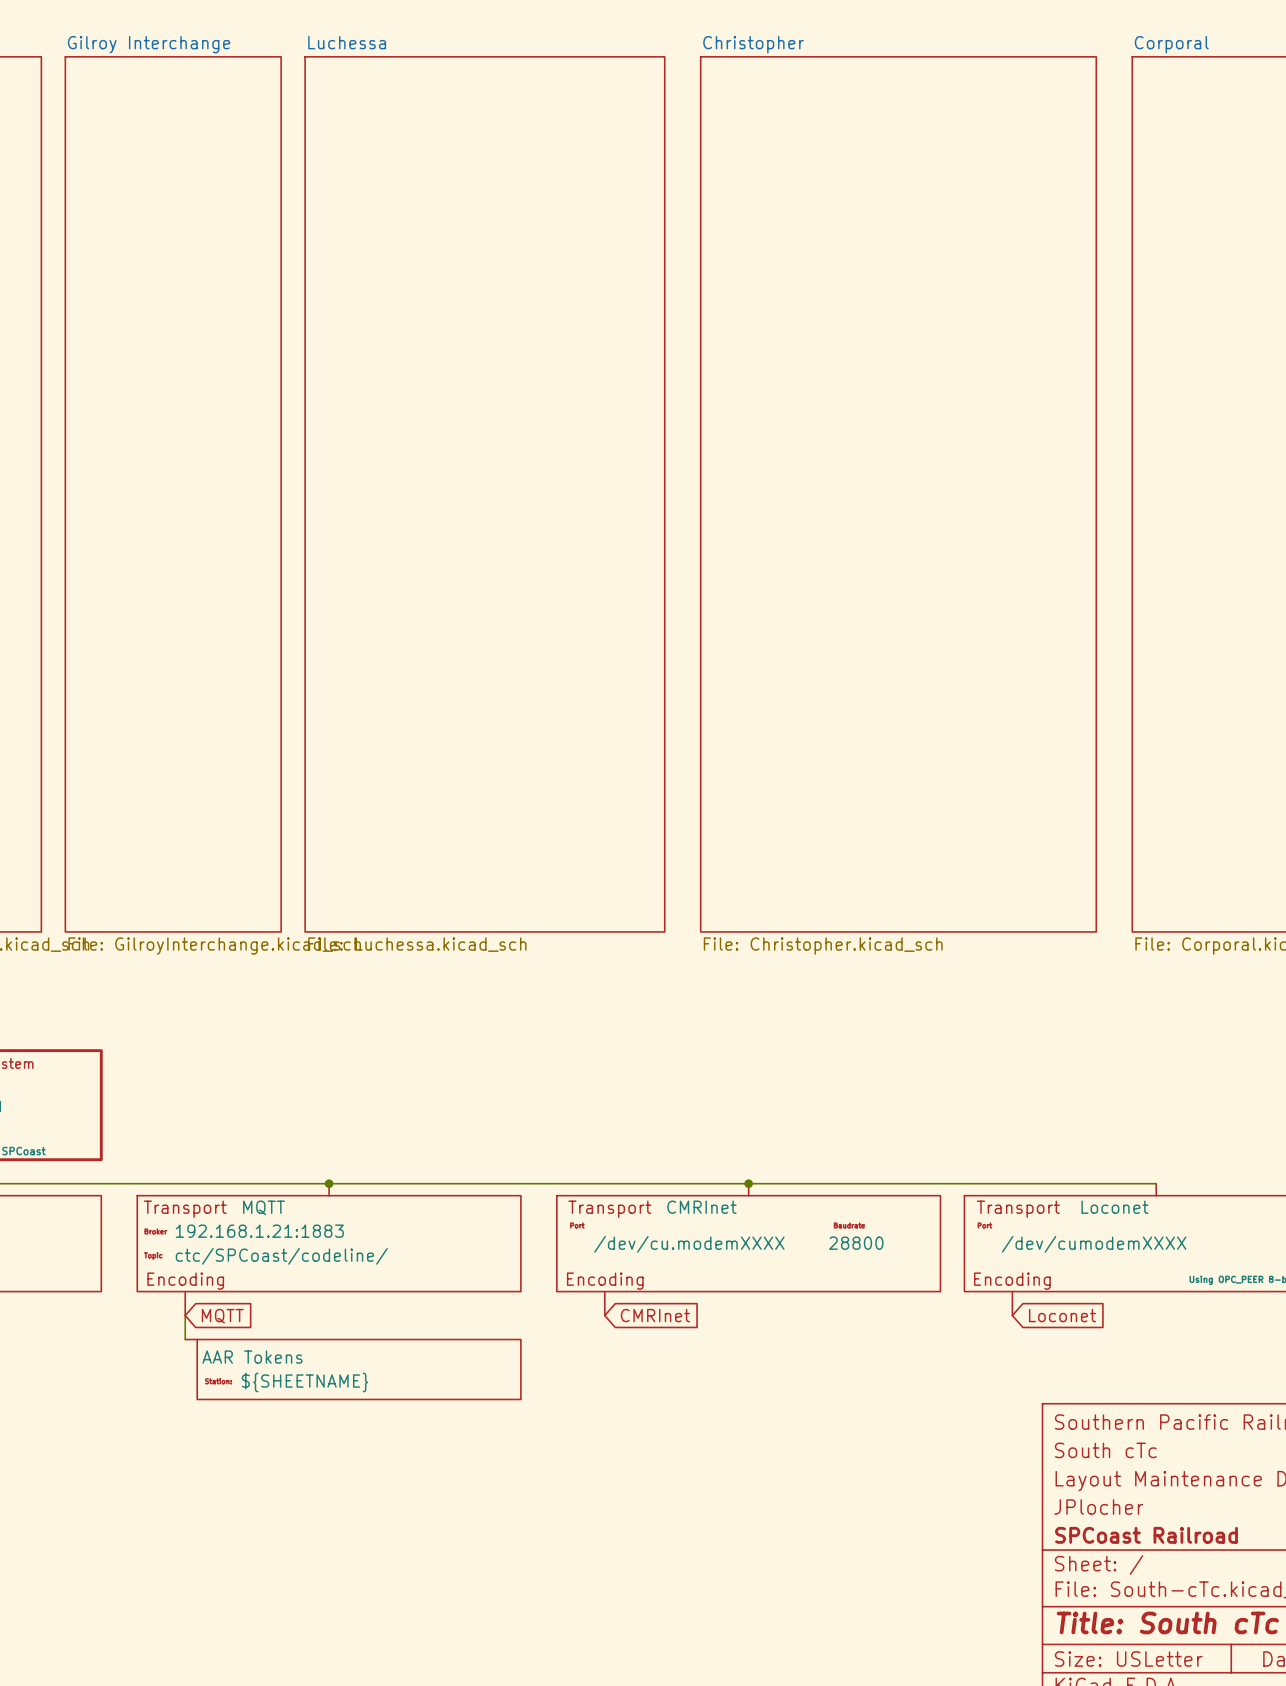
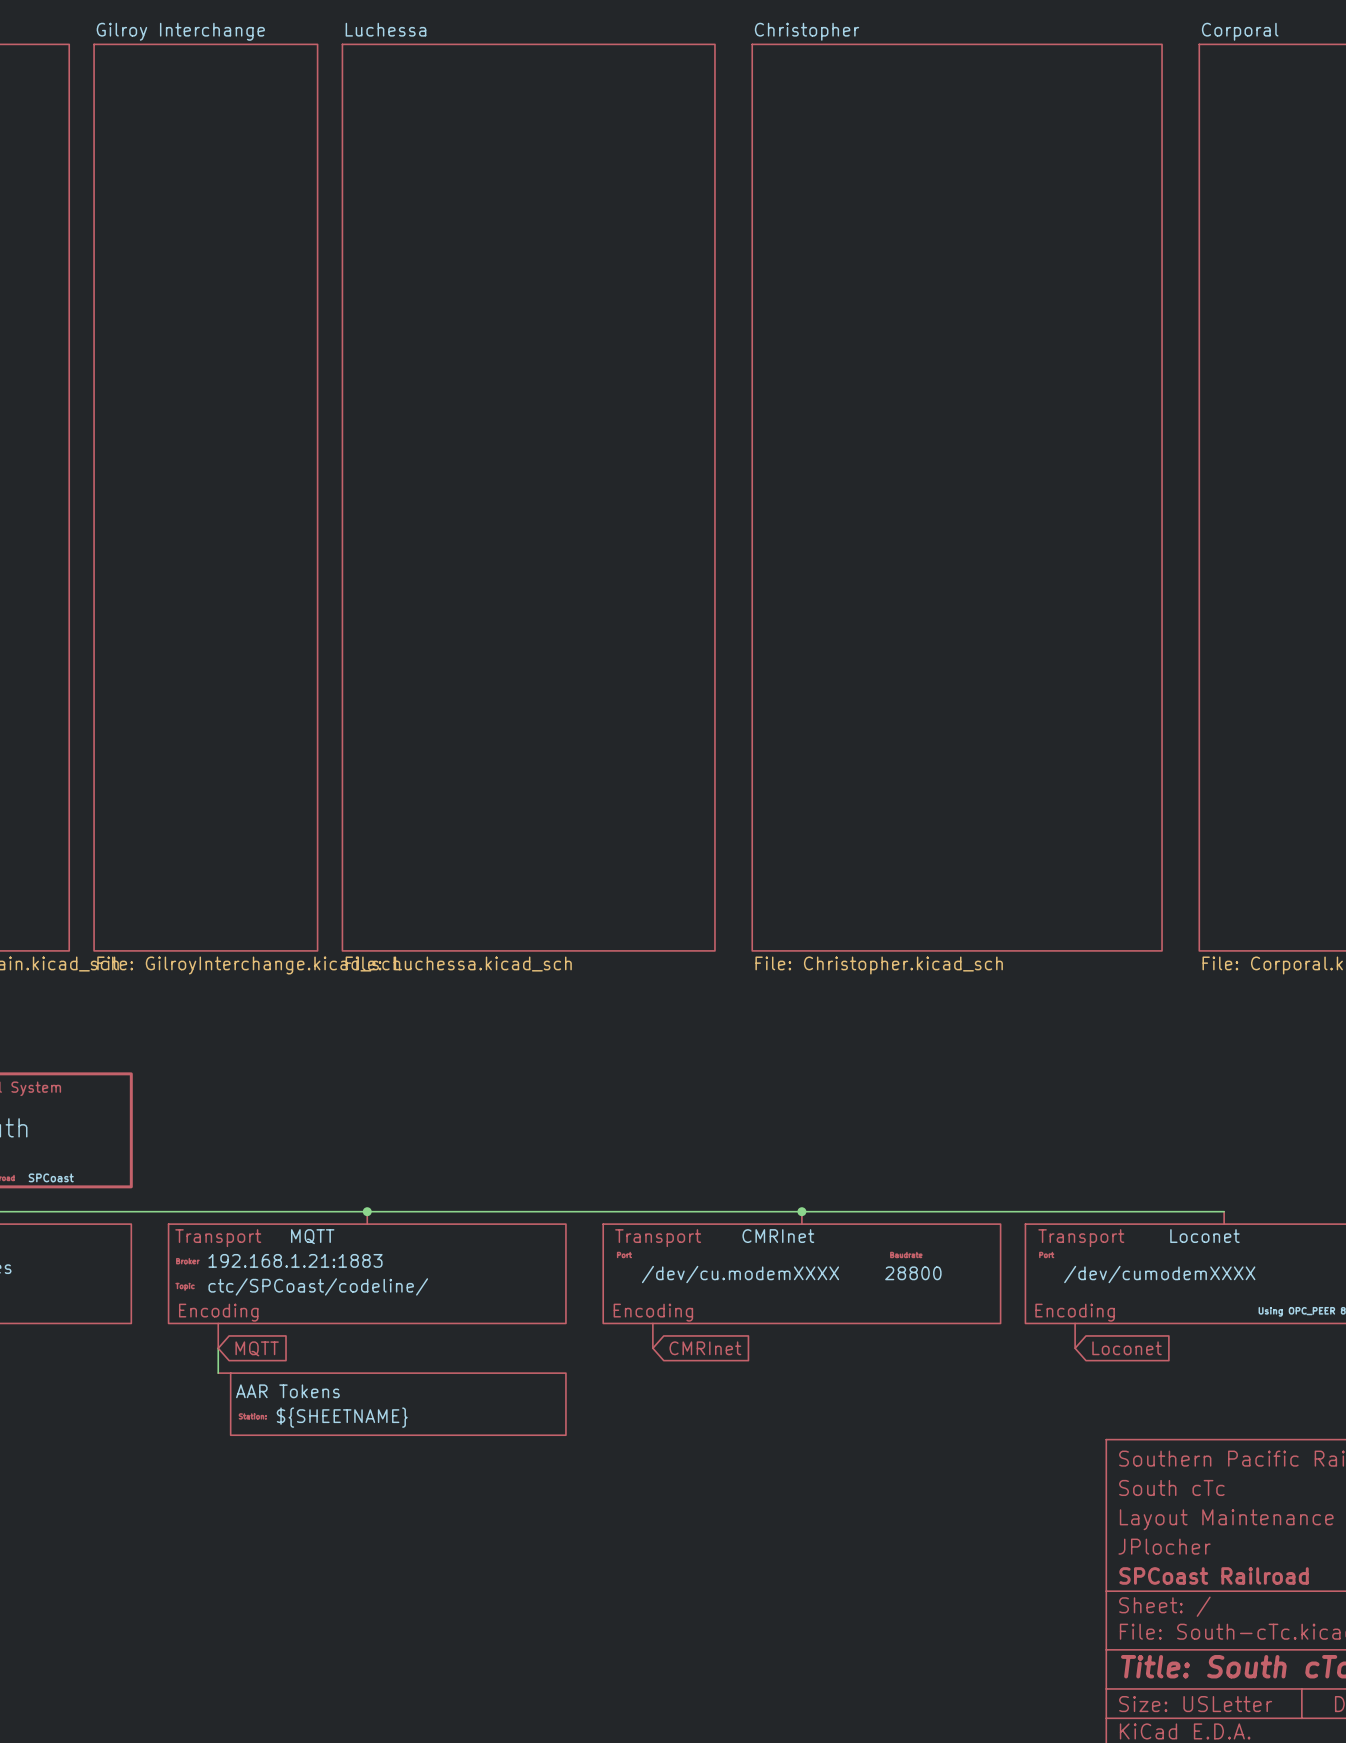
part value position: MQTT (264, 1207) -> MQTT (312, 1236)
part value position: CMRInet (701, 1207) -> CMRInet (778, 1236)
part value position: Loconet (1114, 1207) -> Loconet (1204, 1236)

